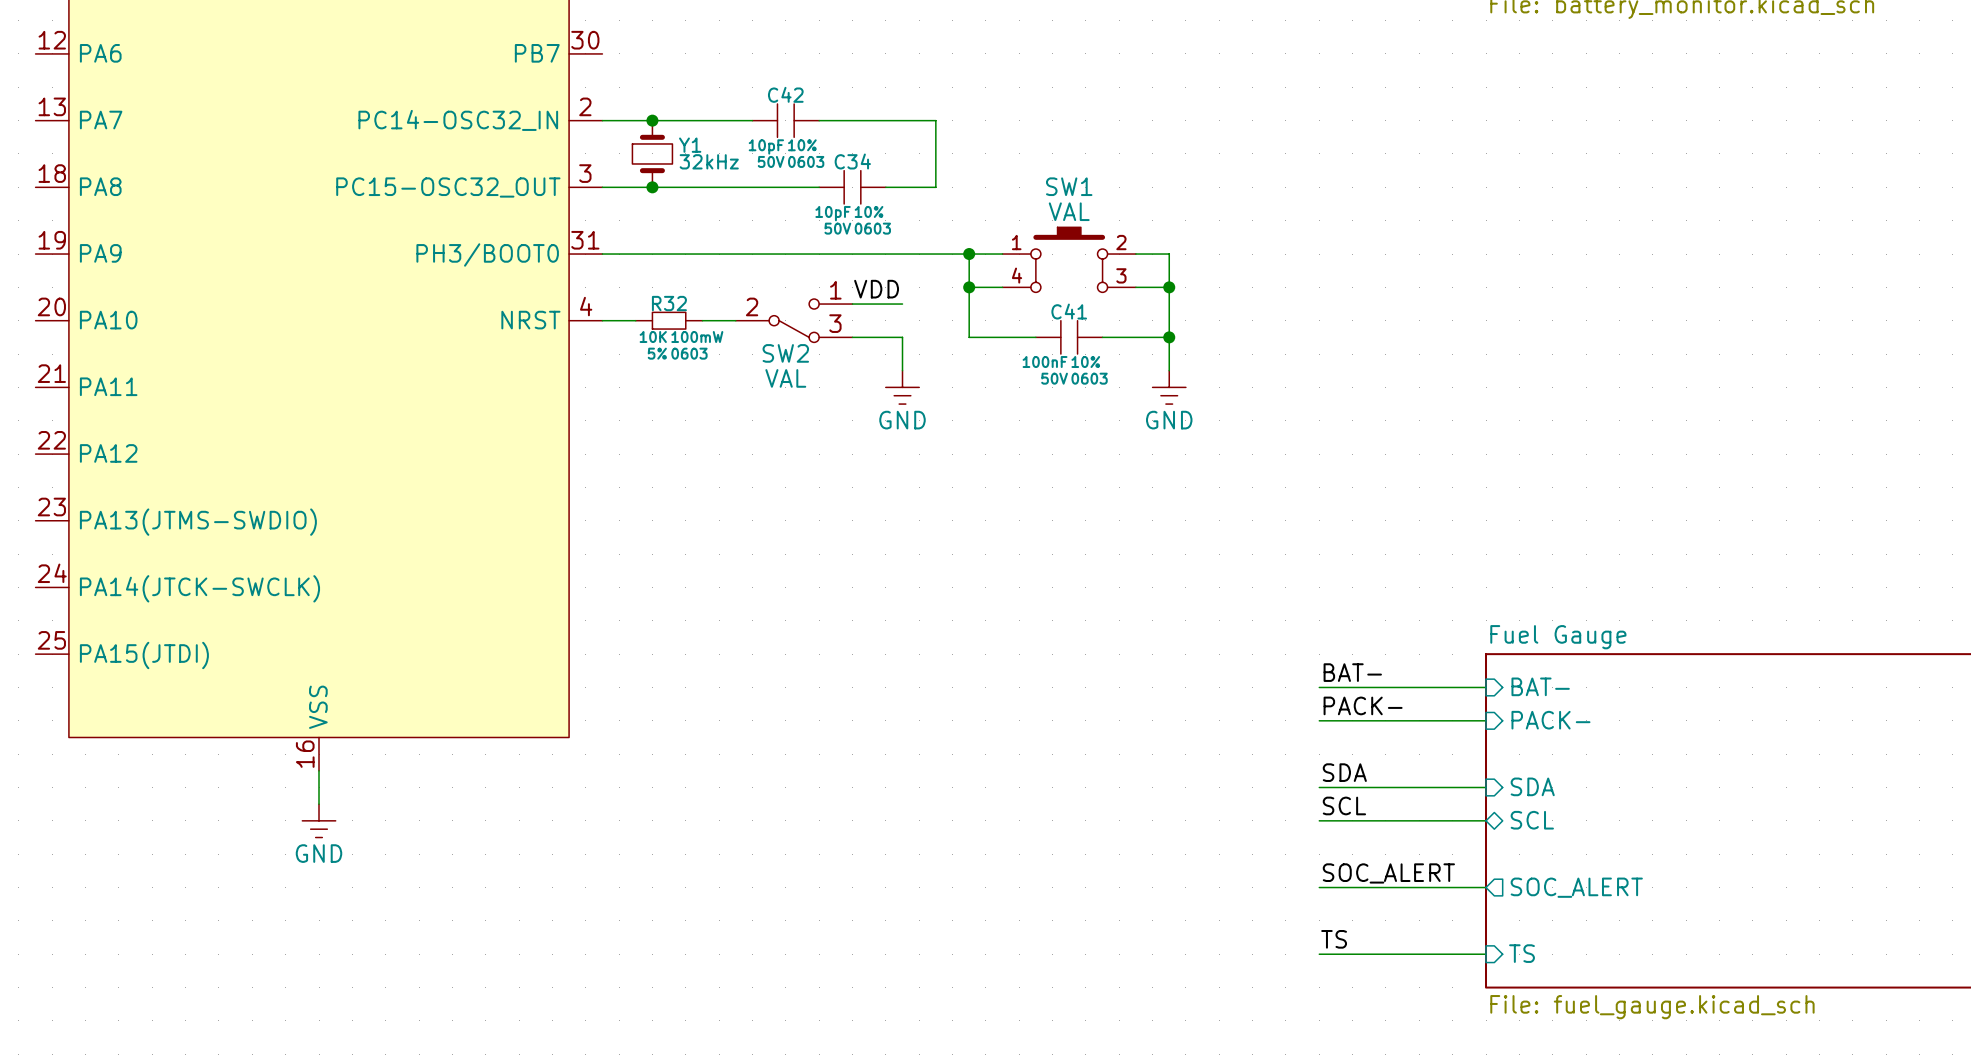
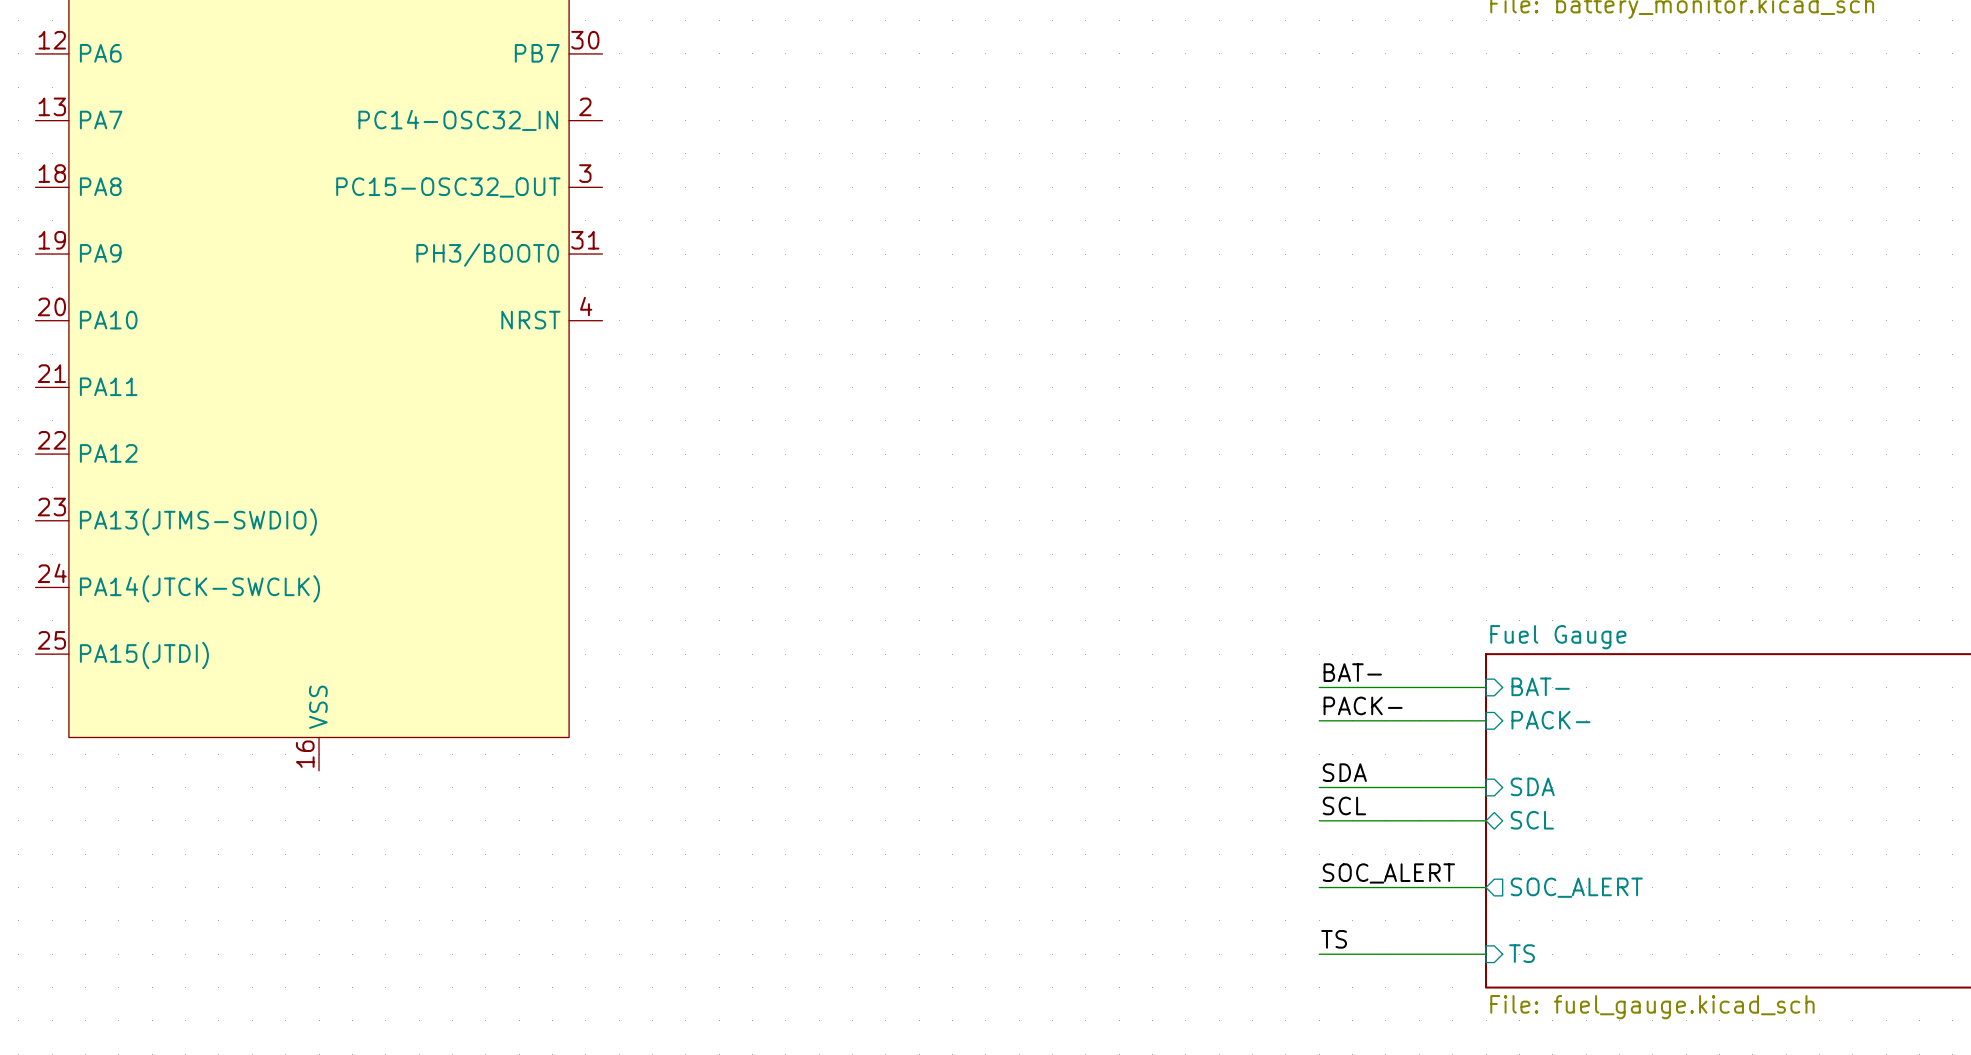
wire: (602, 120) (752, 120) -> none
junction: (652, 120) -> none
C42: 10pF (785, 120) -> none
wire: (819, 120) (935, 120) (935, 187) (885, 187) -> none
Y1: (652, 153) -> none
wire: (602, 187) (819, 187) -> none
junction: (652, 187) -> none
C34: 10pF (852, 187) -> none
wire: (602, 254) (1002, 254) -> none
wire: (969, 254) (969, 337) (1035, 337) -> none
junction: (969, 254) -> none
wire: (1135, 254) (1169, 254) (1169, 370) -> none
SW1: VAL (1069, 259) -> none
wire: (969, 287) (1002, 287) -> none
junction: (969, 287) -> none
wire: (1135, 287) (1169, 287) -> none
junction: (1169, 287) -> none
label: VDD (876, 289) -> none
wire: (852, 304) (902, 304) -> none
wire: (602, 320) (635, 320) -> none
R32: 10K (669, 320) -> none
wire: (702, 320) (735, 320) -> none
SW2: VAL (794, 320) -> none
wire: (852, 337) (902, 337) (902, 370) -> none
C41: 100nF (1069, 337) -> none
wire: (1102, 337) (1169, 337) -> none
junction: (1169, 337) -> none
power symbol: GND (902, 387) -> none
power symbol: GND (1169, 387) -> none
wire: (319, 770) (319, 804) -> none
power symbol: GND (319, 820) -> none

